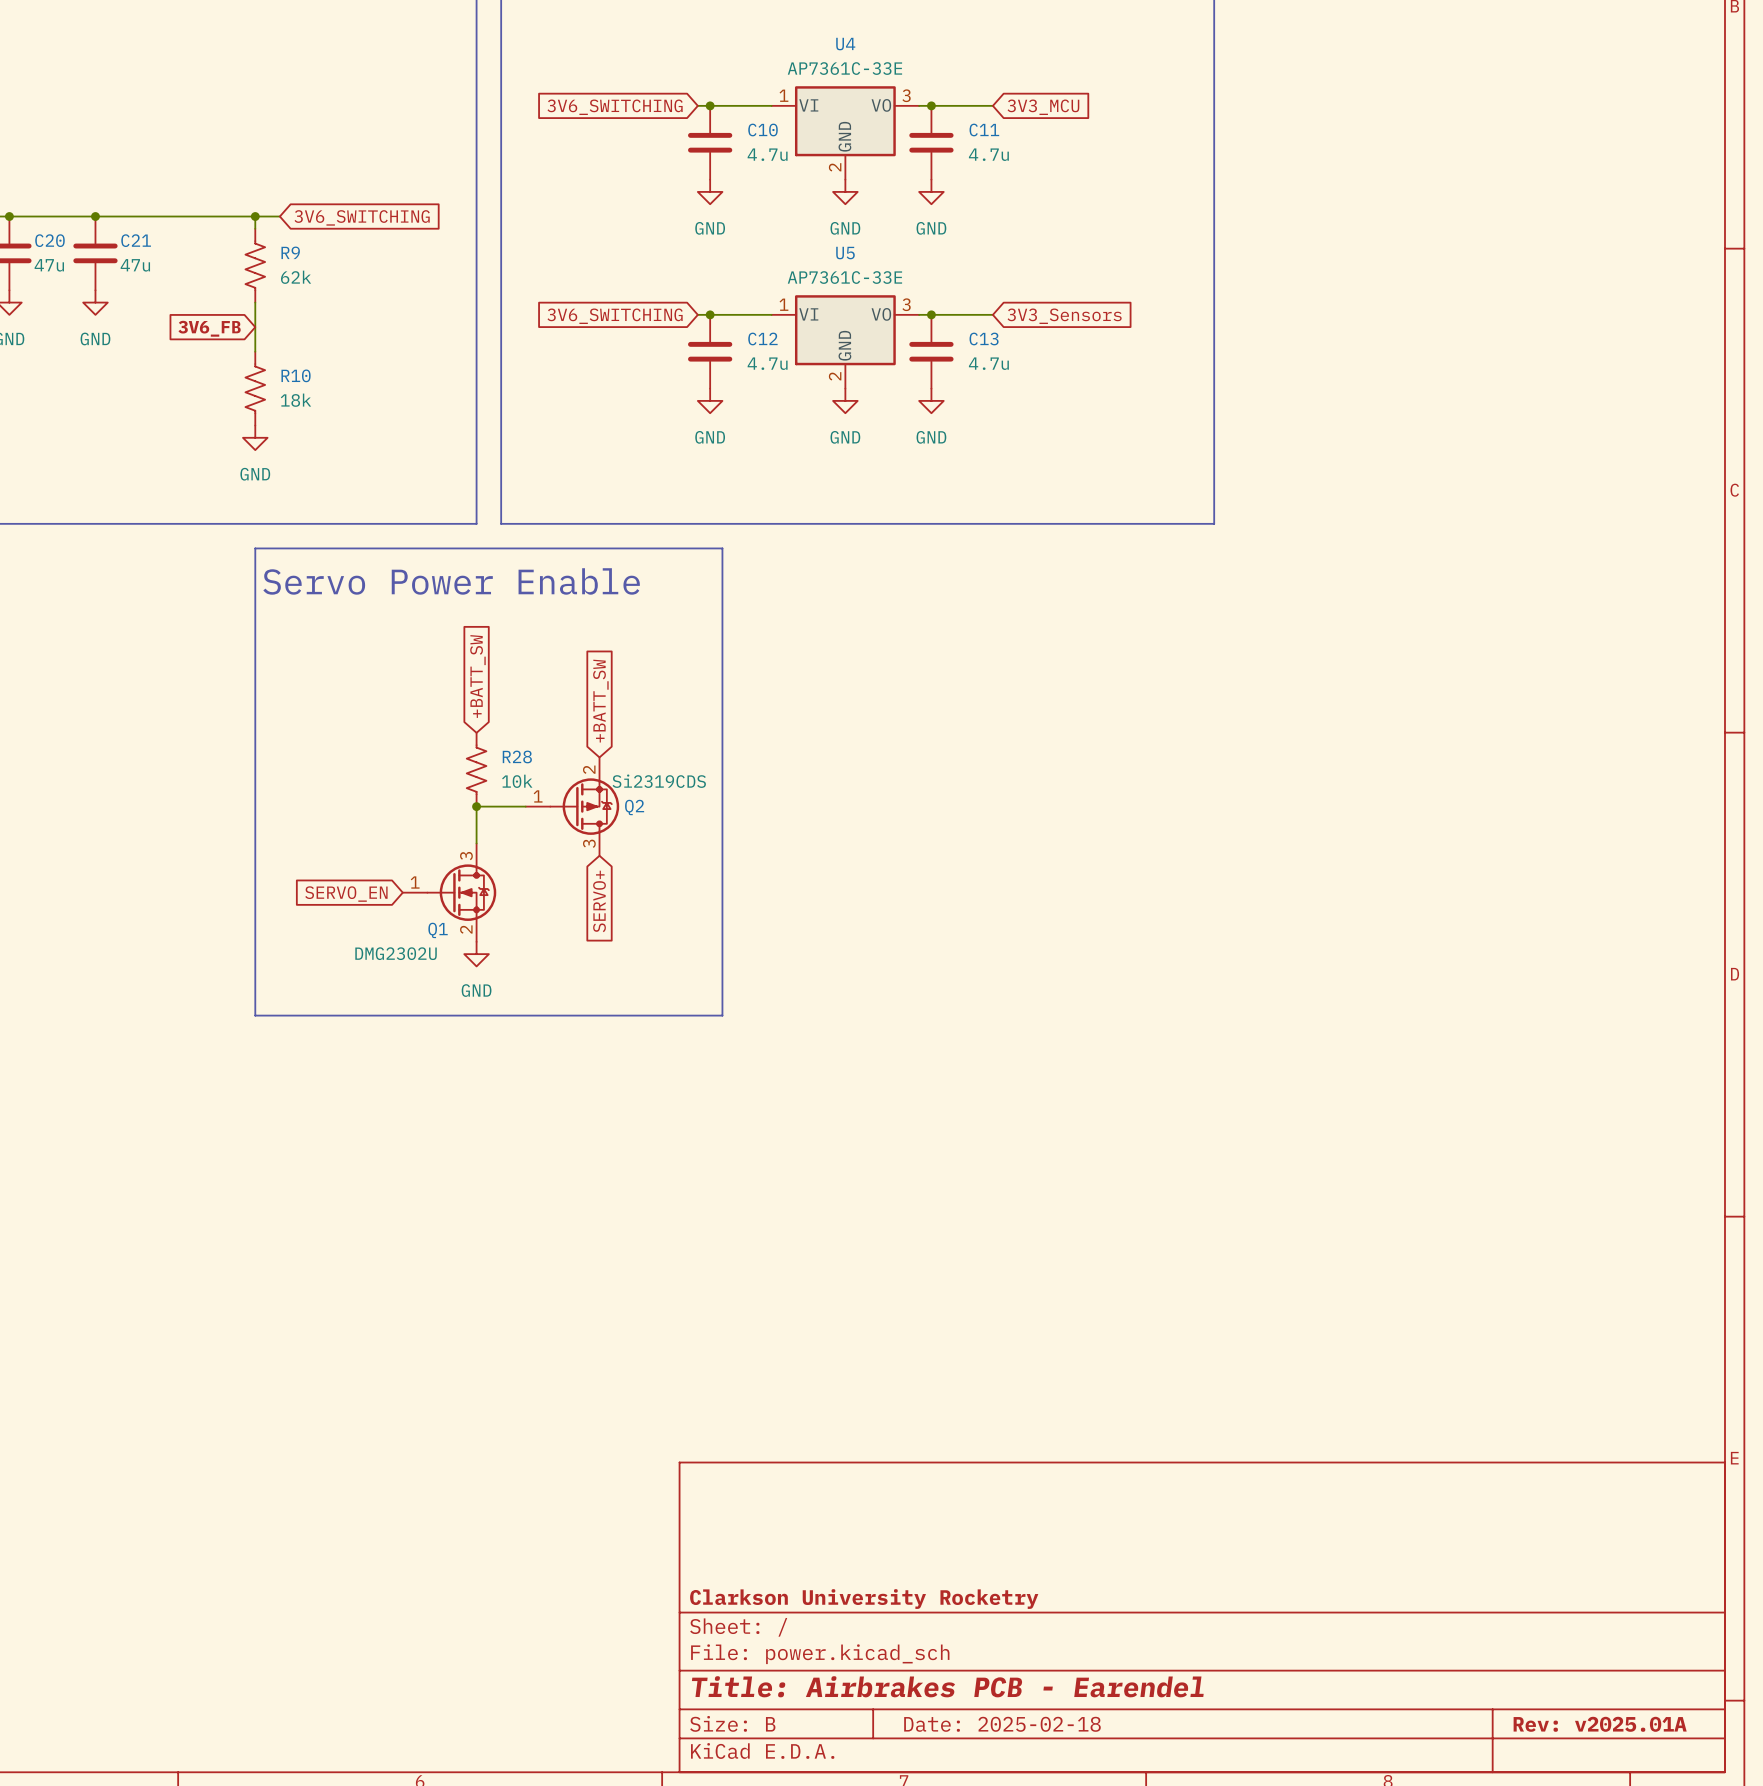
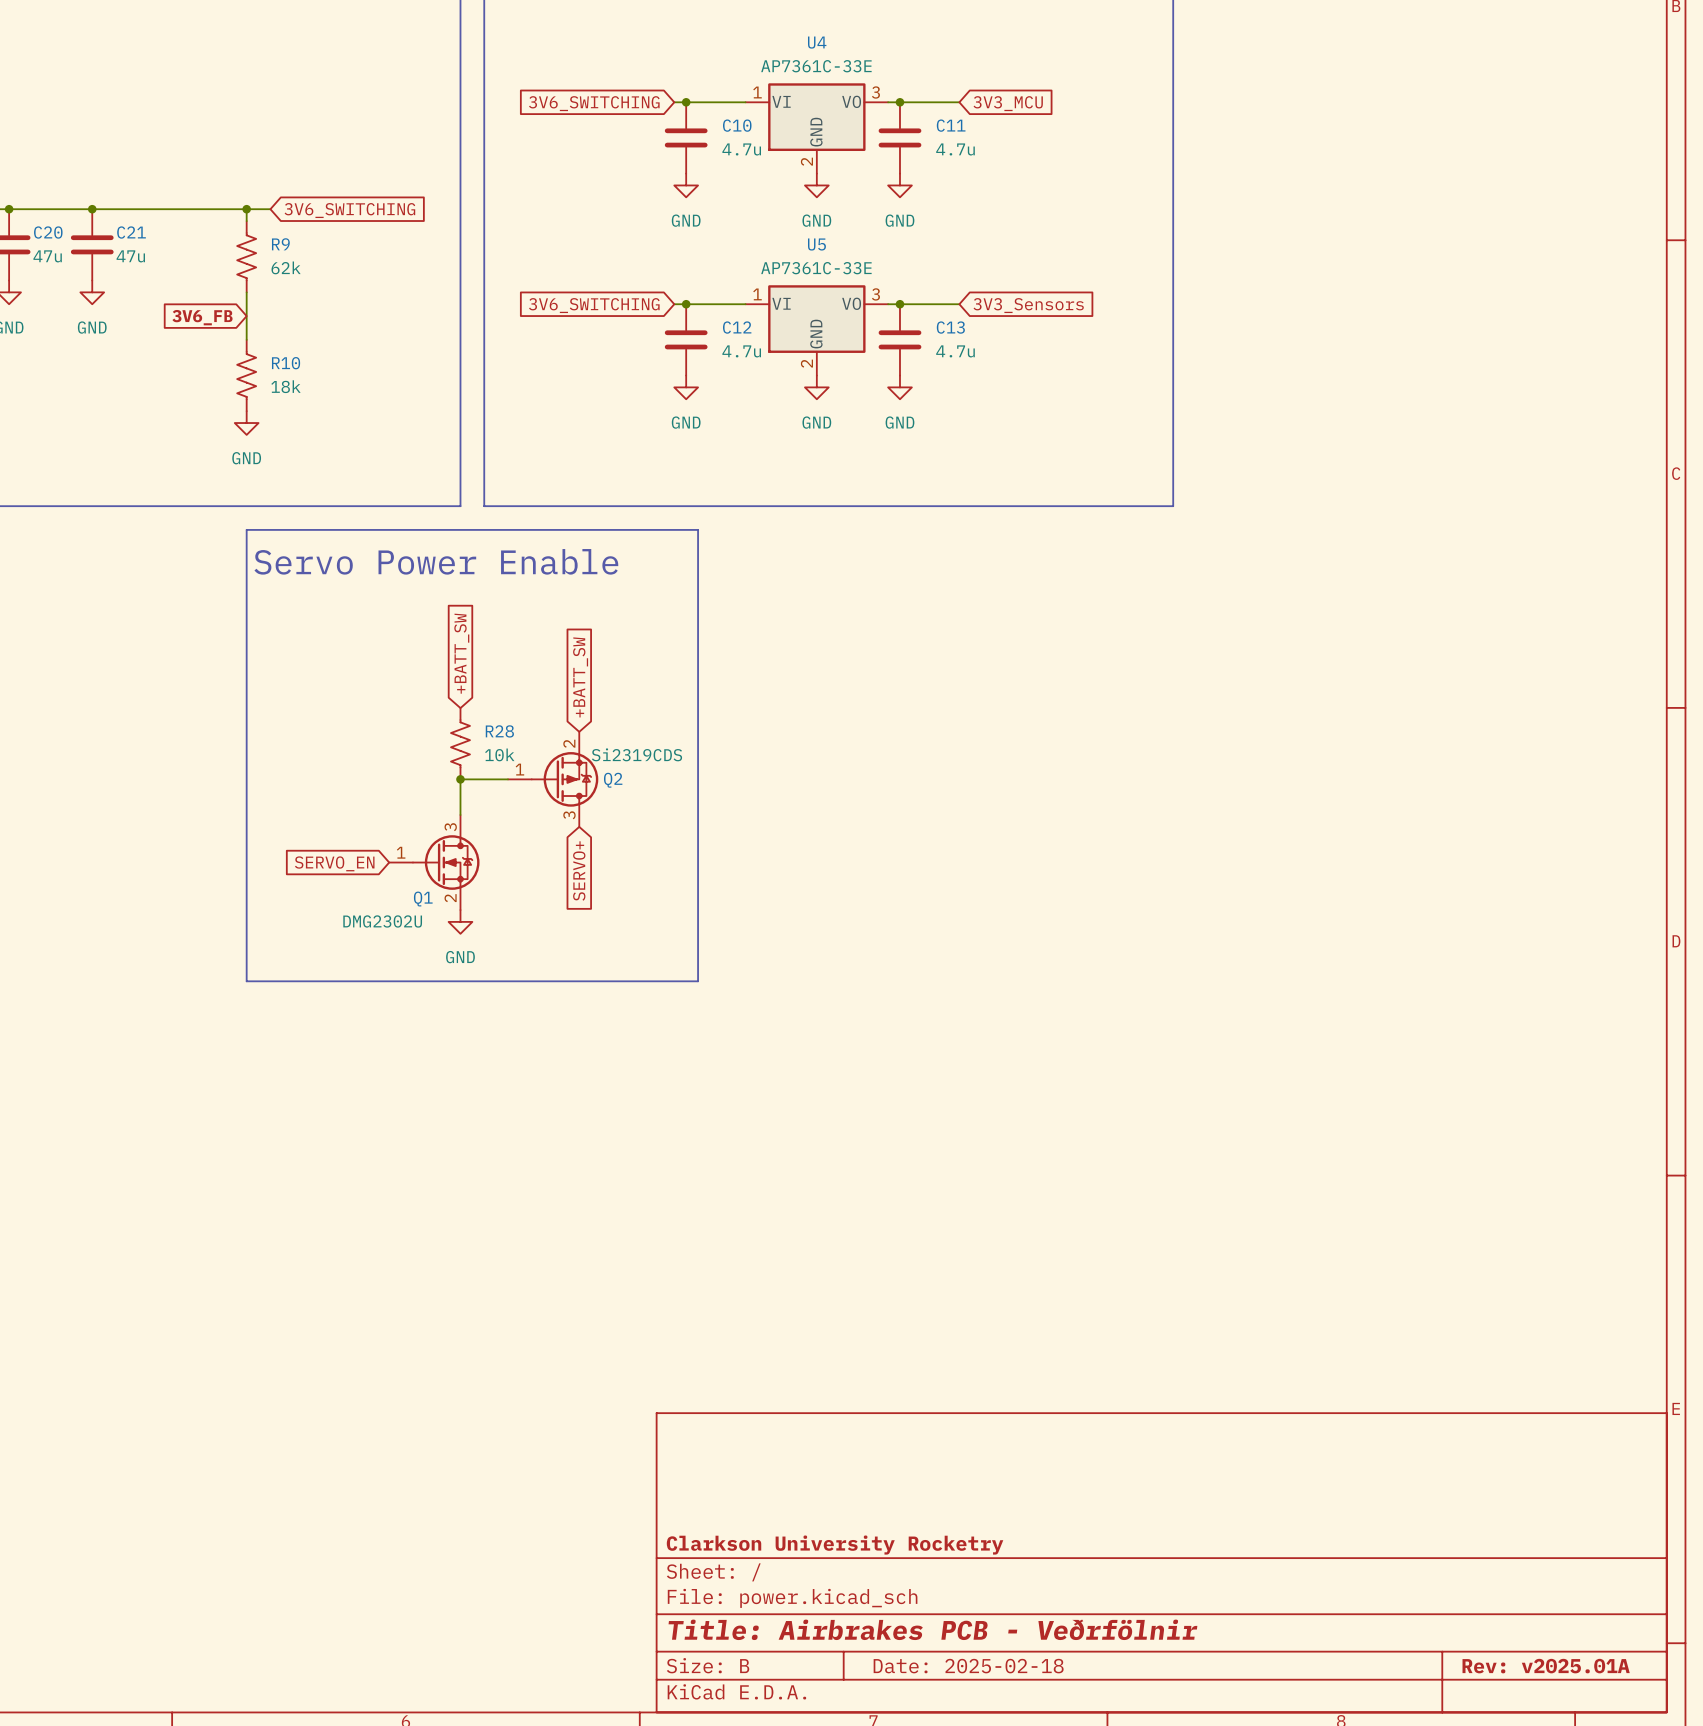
title block: Title: Airbrakes PCB - Earendel (947, 1686) -> Title: Airbrakes PCB - Veðrfölnir (932, 1629)

